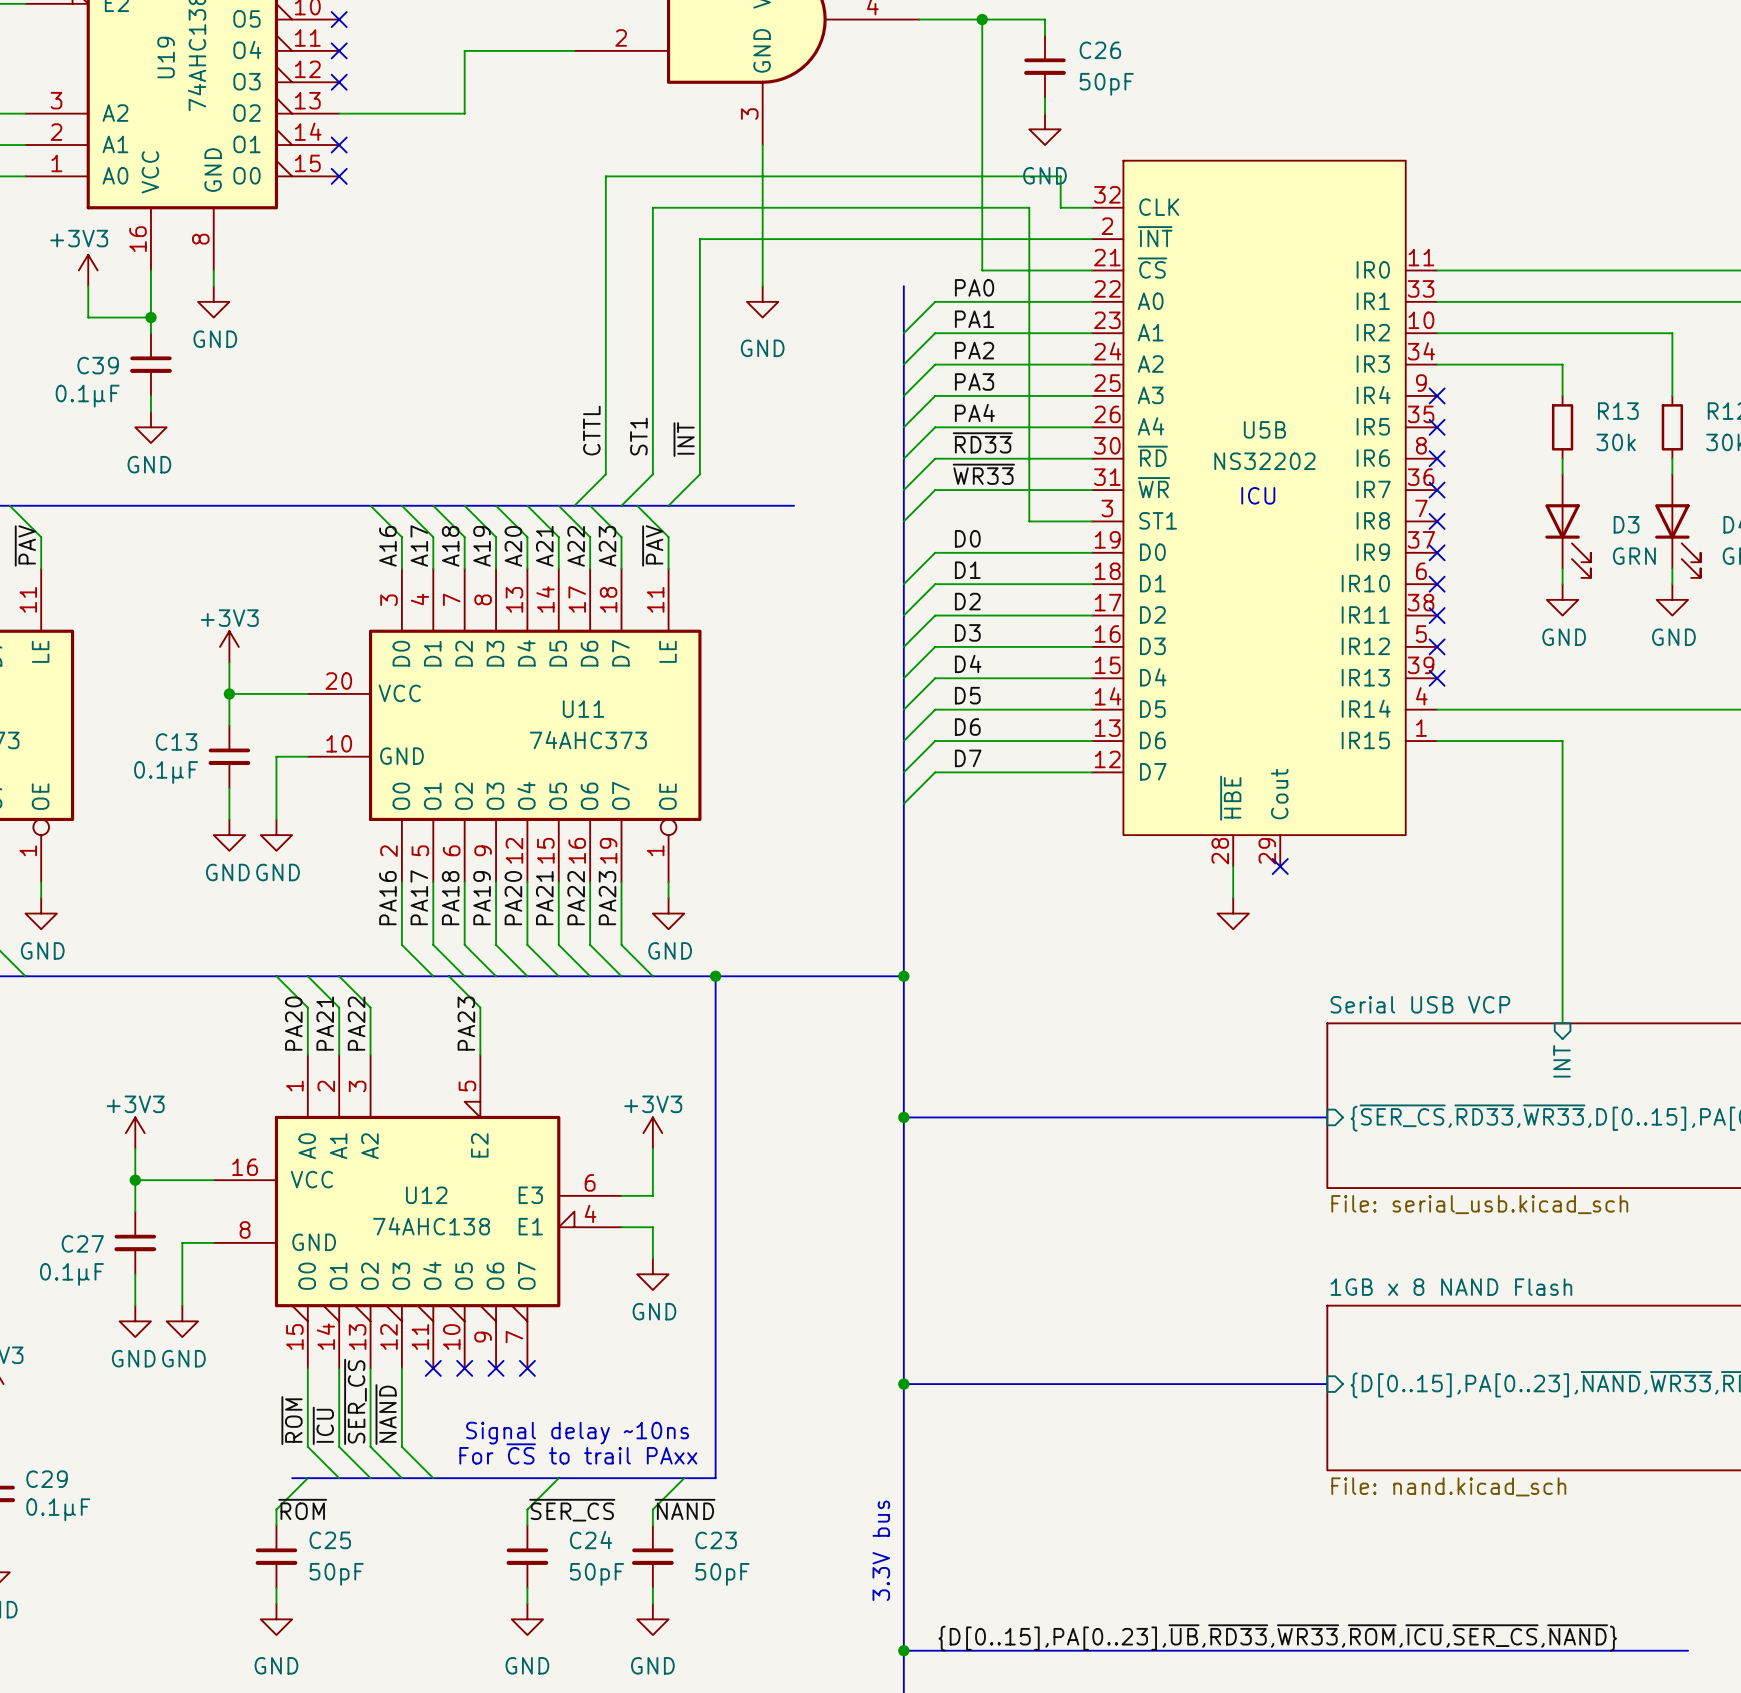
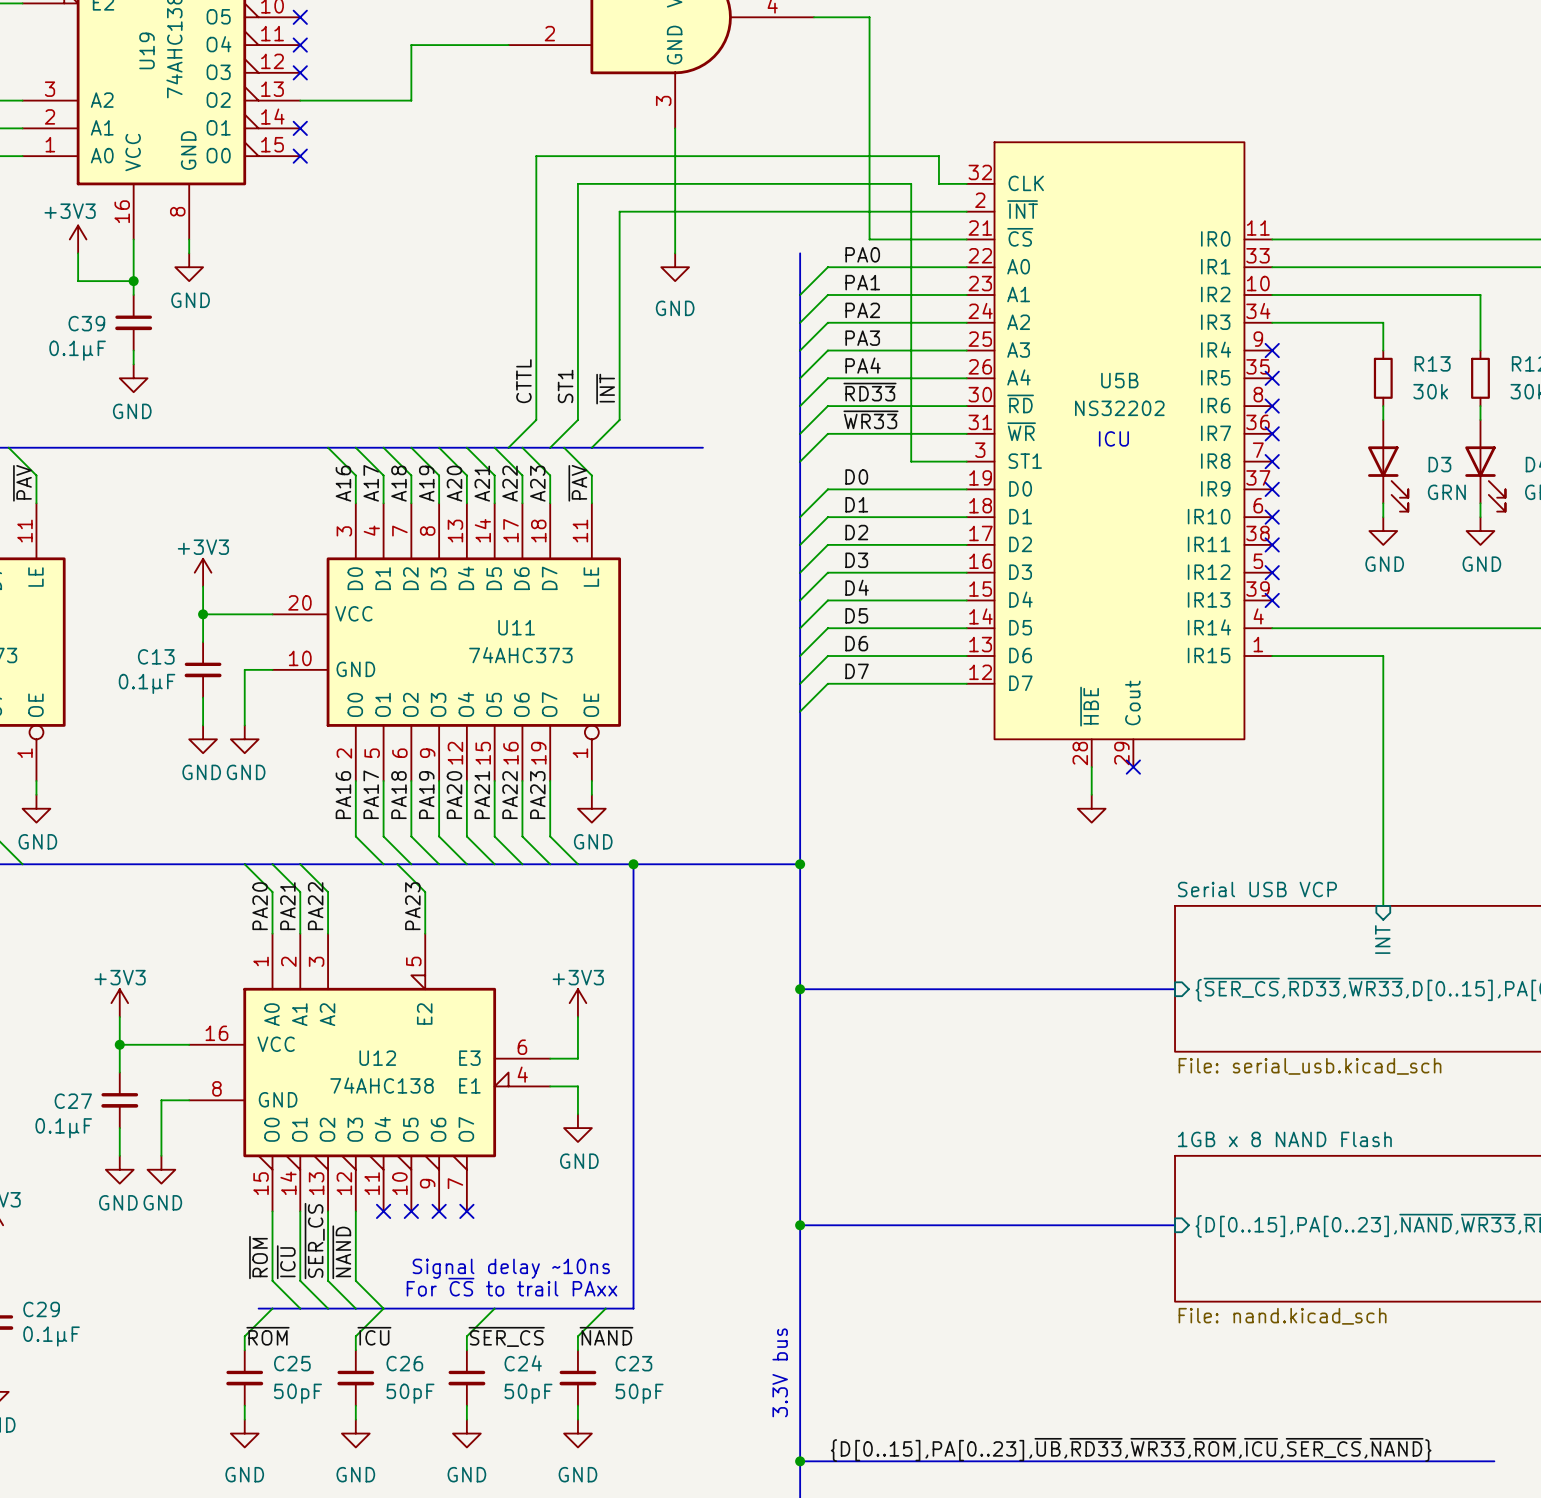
wire: (982, 19) (1044, 19) (1044, 35) -> none
junction: (982, 19) -> none
C26 position: (1044, 66) -> (355, 1378)
wire: (1044, 97) (1044, 113) -> none
power symbol: GND (1044, 129) -> none
wire: none -> (383, 1308) (355, 1336) (355, 1350)
label: none -> ~{ICU} (374, 1336)
wire: none -> (355, 1405) (355, 1419)
power symbol: none -> GND (355, 1433)

